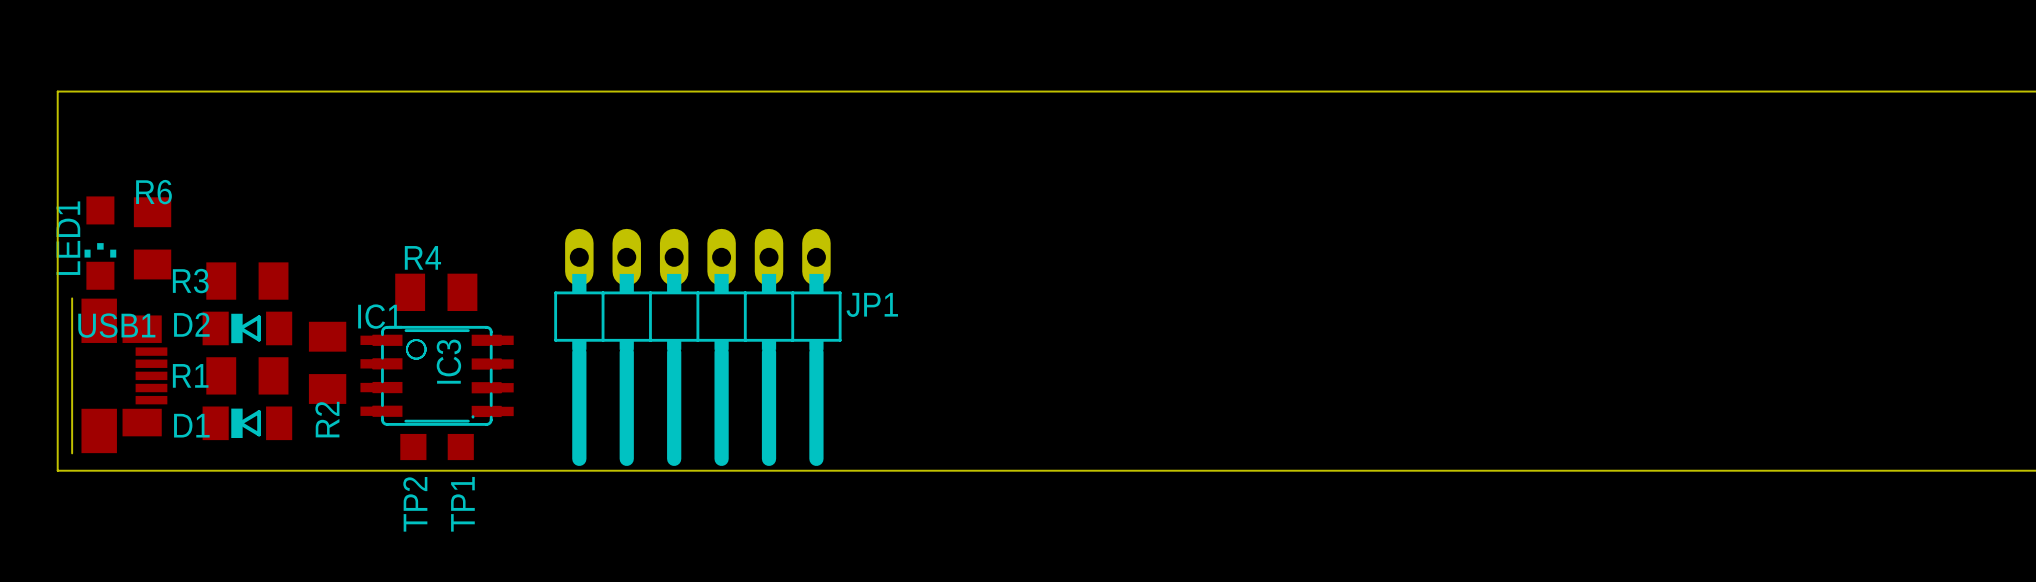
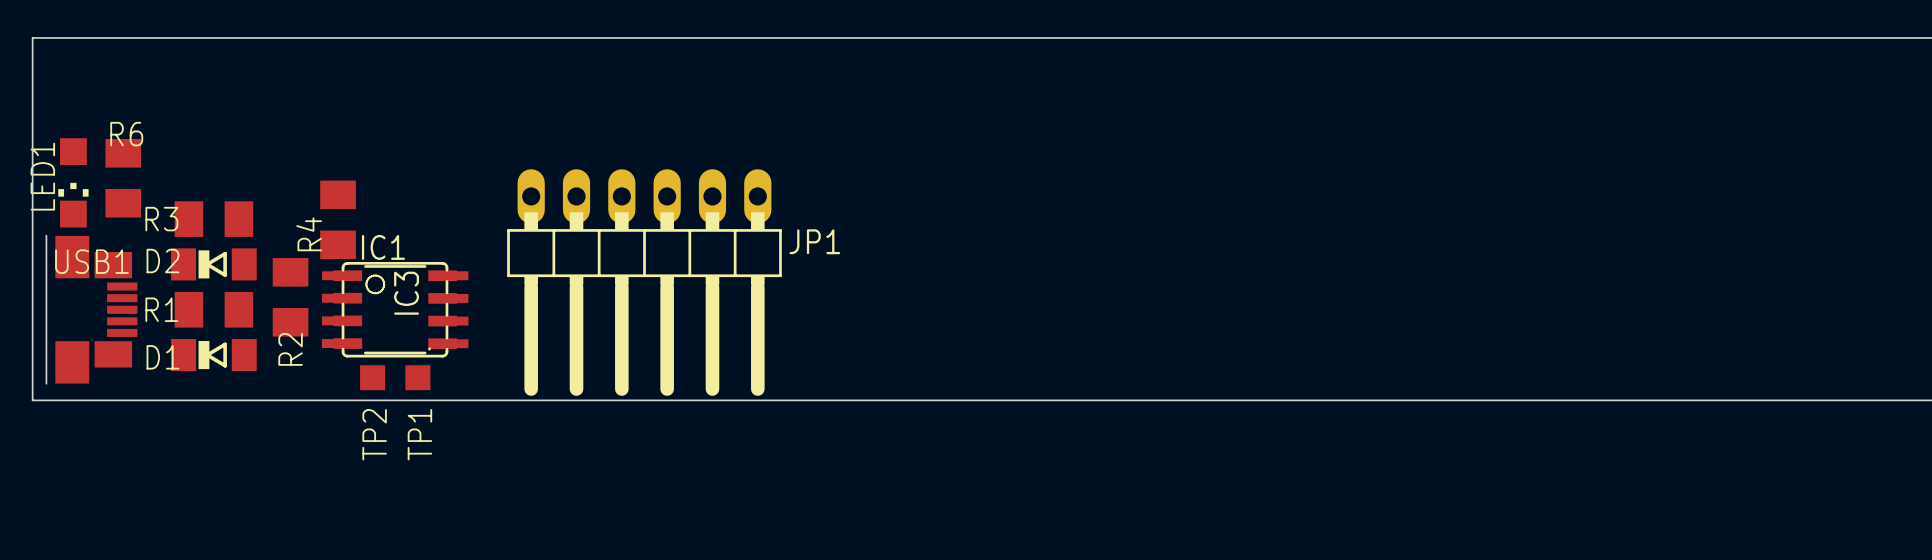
R4 name position: R4 (422, 257) -> R4 (309, 234)
R4 rotation: 0° (436, 292) -> 90° clockwise (338, 219)
R4 position: (436, 292) -> (338, 219)
IC1 name position: IC1 (380, 316) -> IC1 (383, 247)

